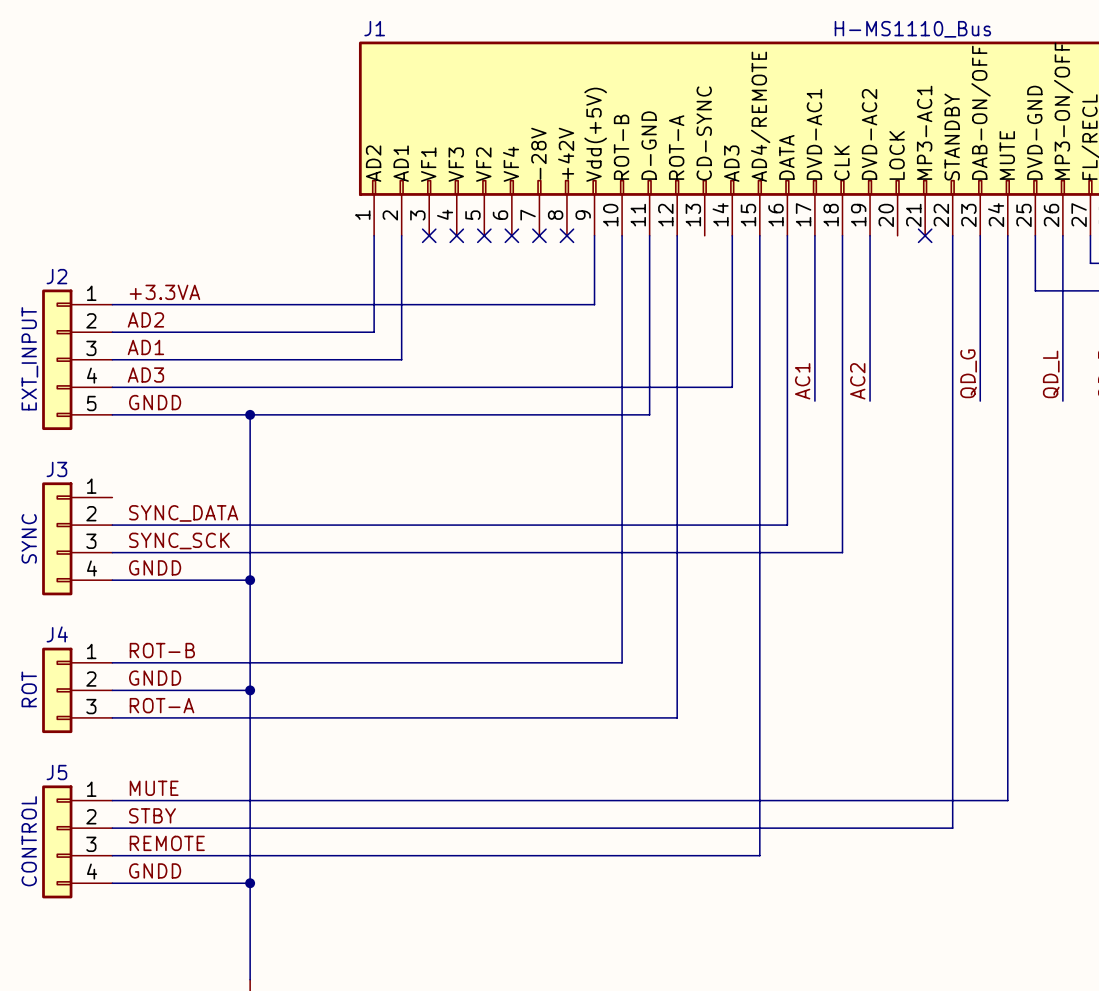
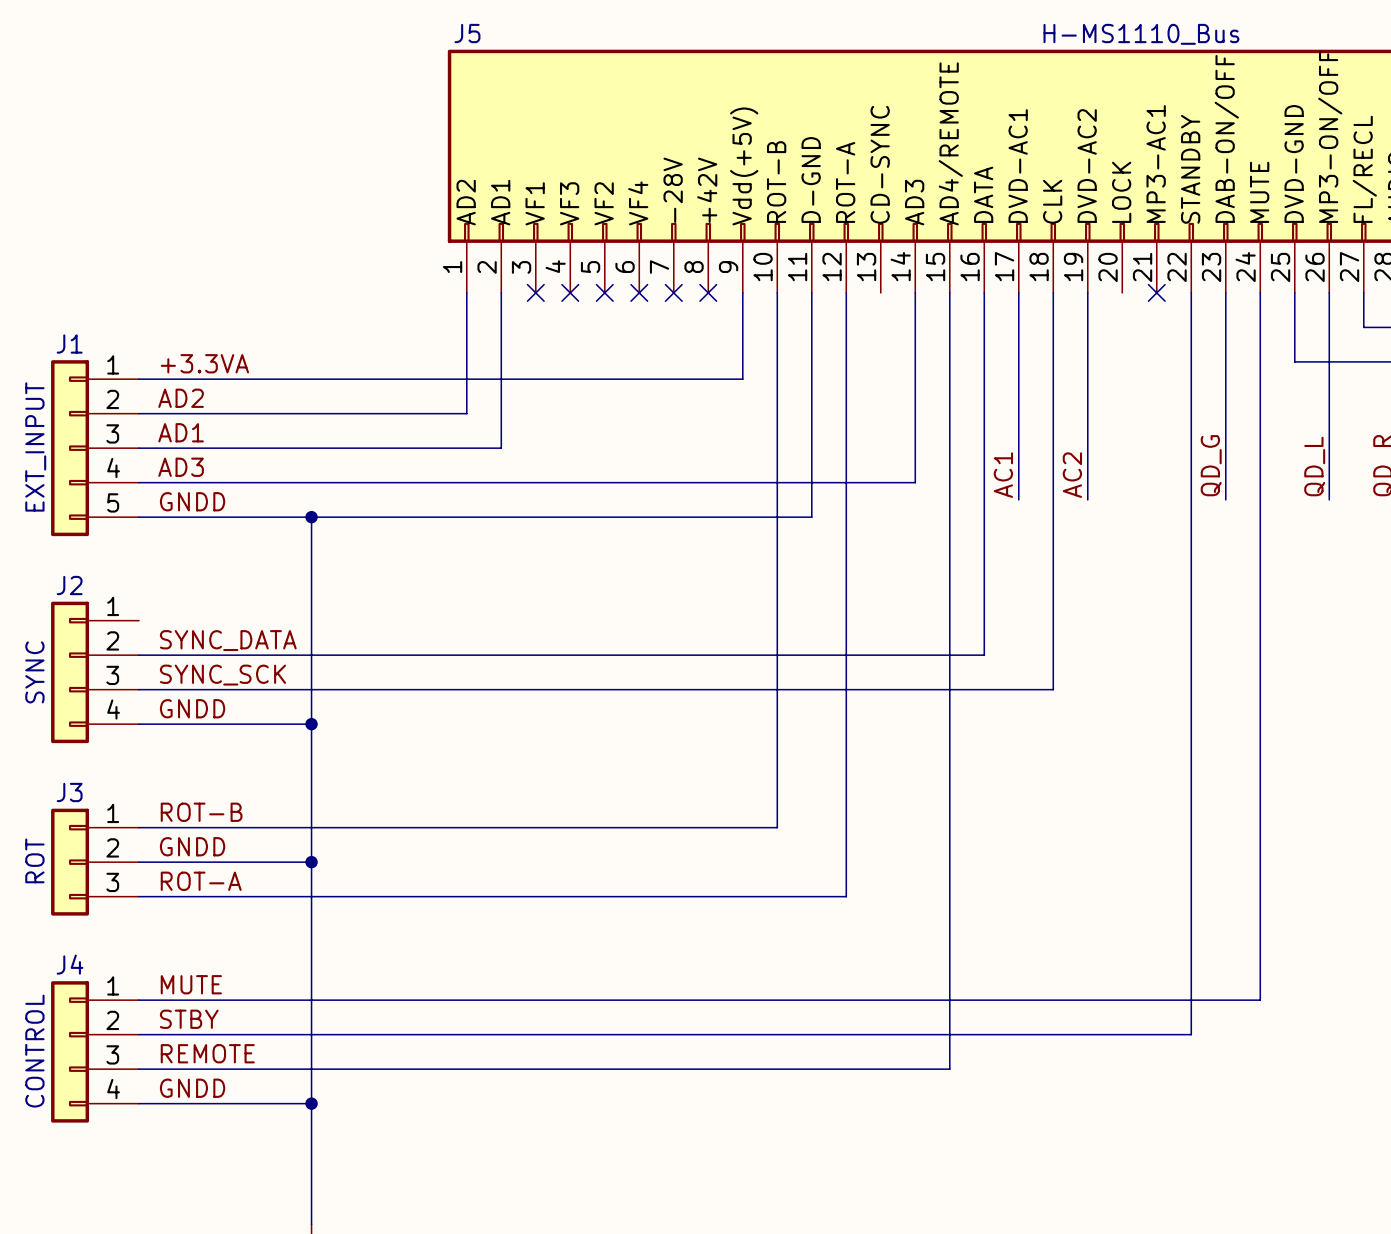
J1 name: J1 (374, 28) -> J5 (467, 33)
J2 name: J2 (56, 276) -> J1 (69, 344)
J3 name: J3 (56, 469) -> J2 (69, 585)
J4 name: J4 (57, 634) -> J3 (69, 792)
J5 name: J5 (56, 772) -> J4 (70, 964)

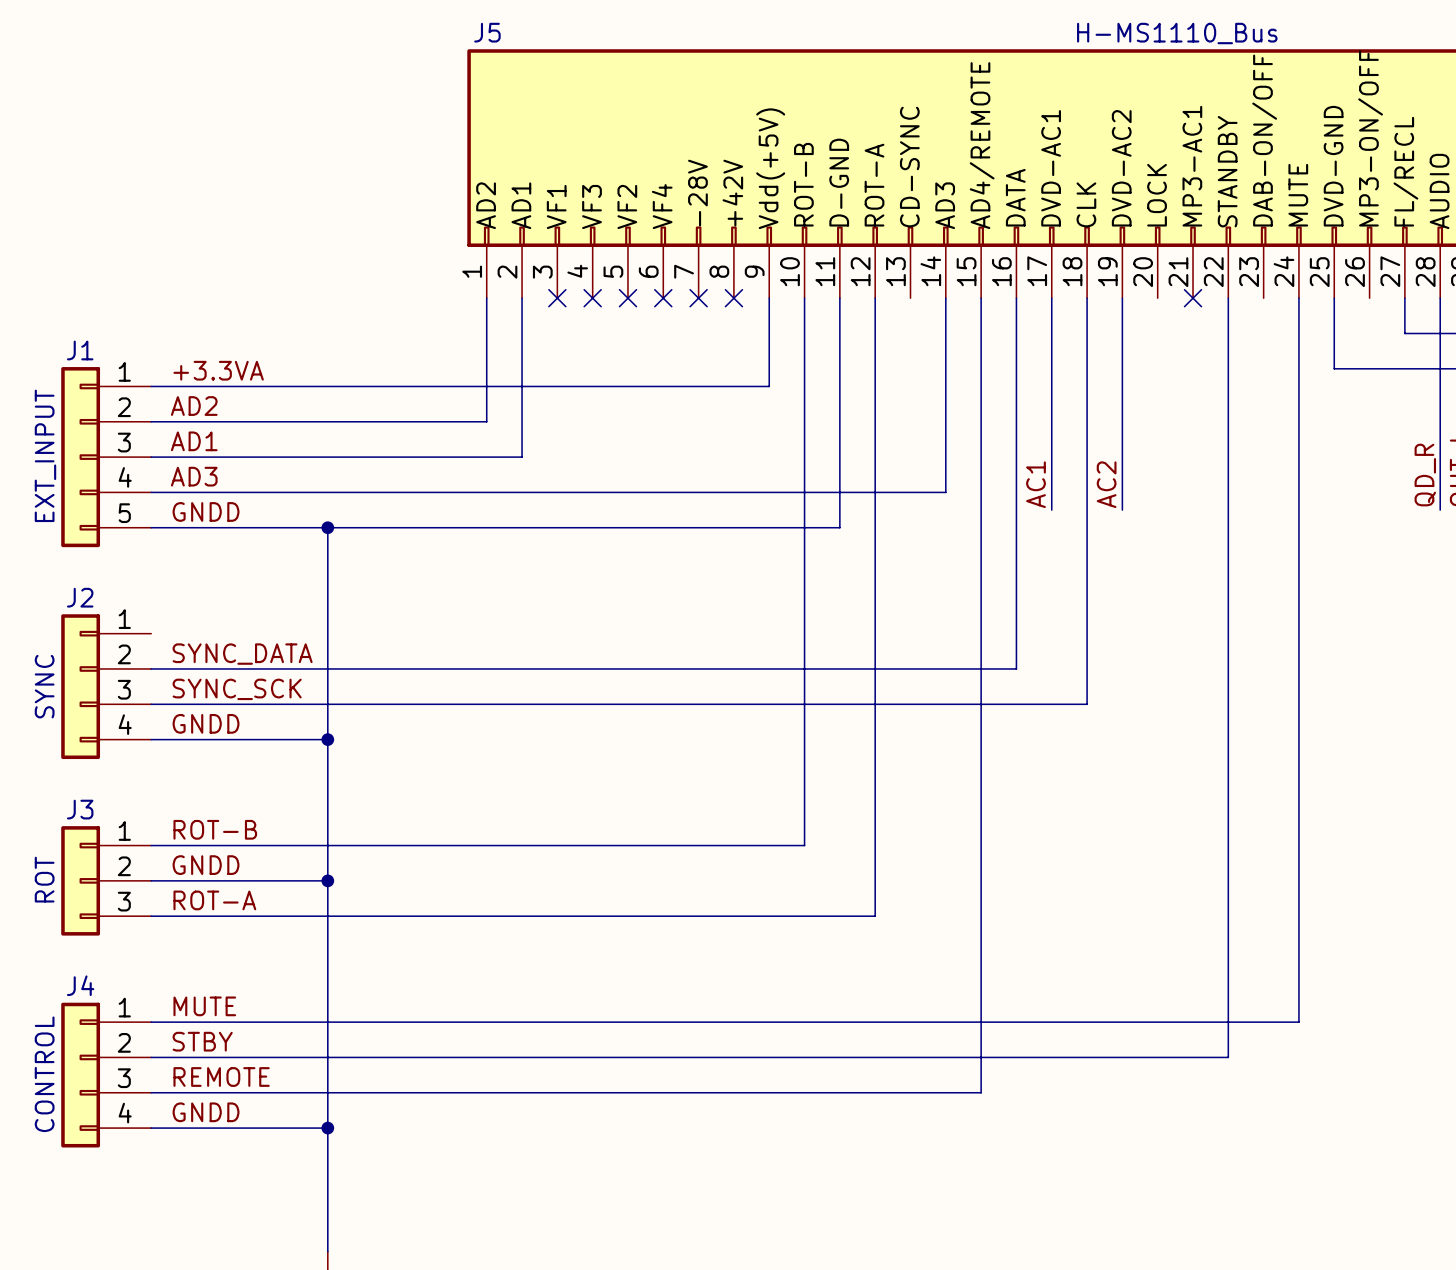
wire: (1225, 292) (1225, 499) -> none
wire: (1329, 292) (1329, 499) -> none
label: QD_G (1211, 465) -> none
label: QD_L (1314, 466) -> none

